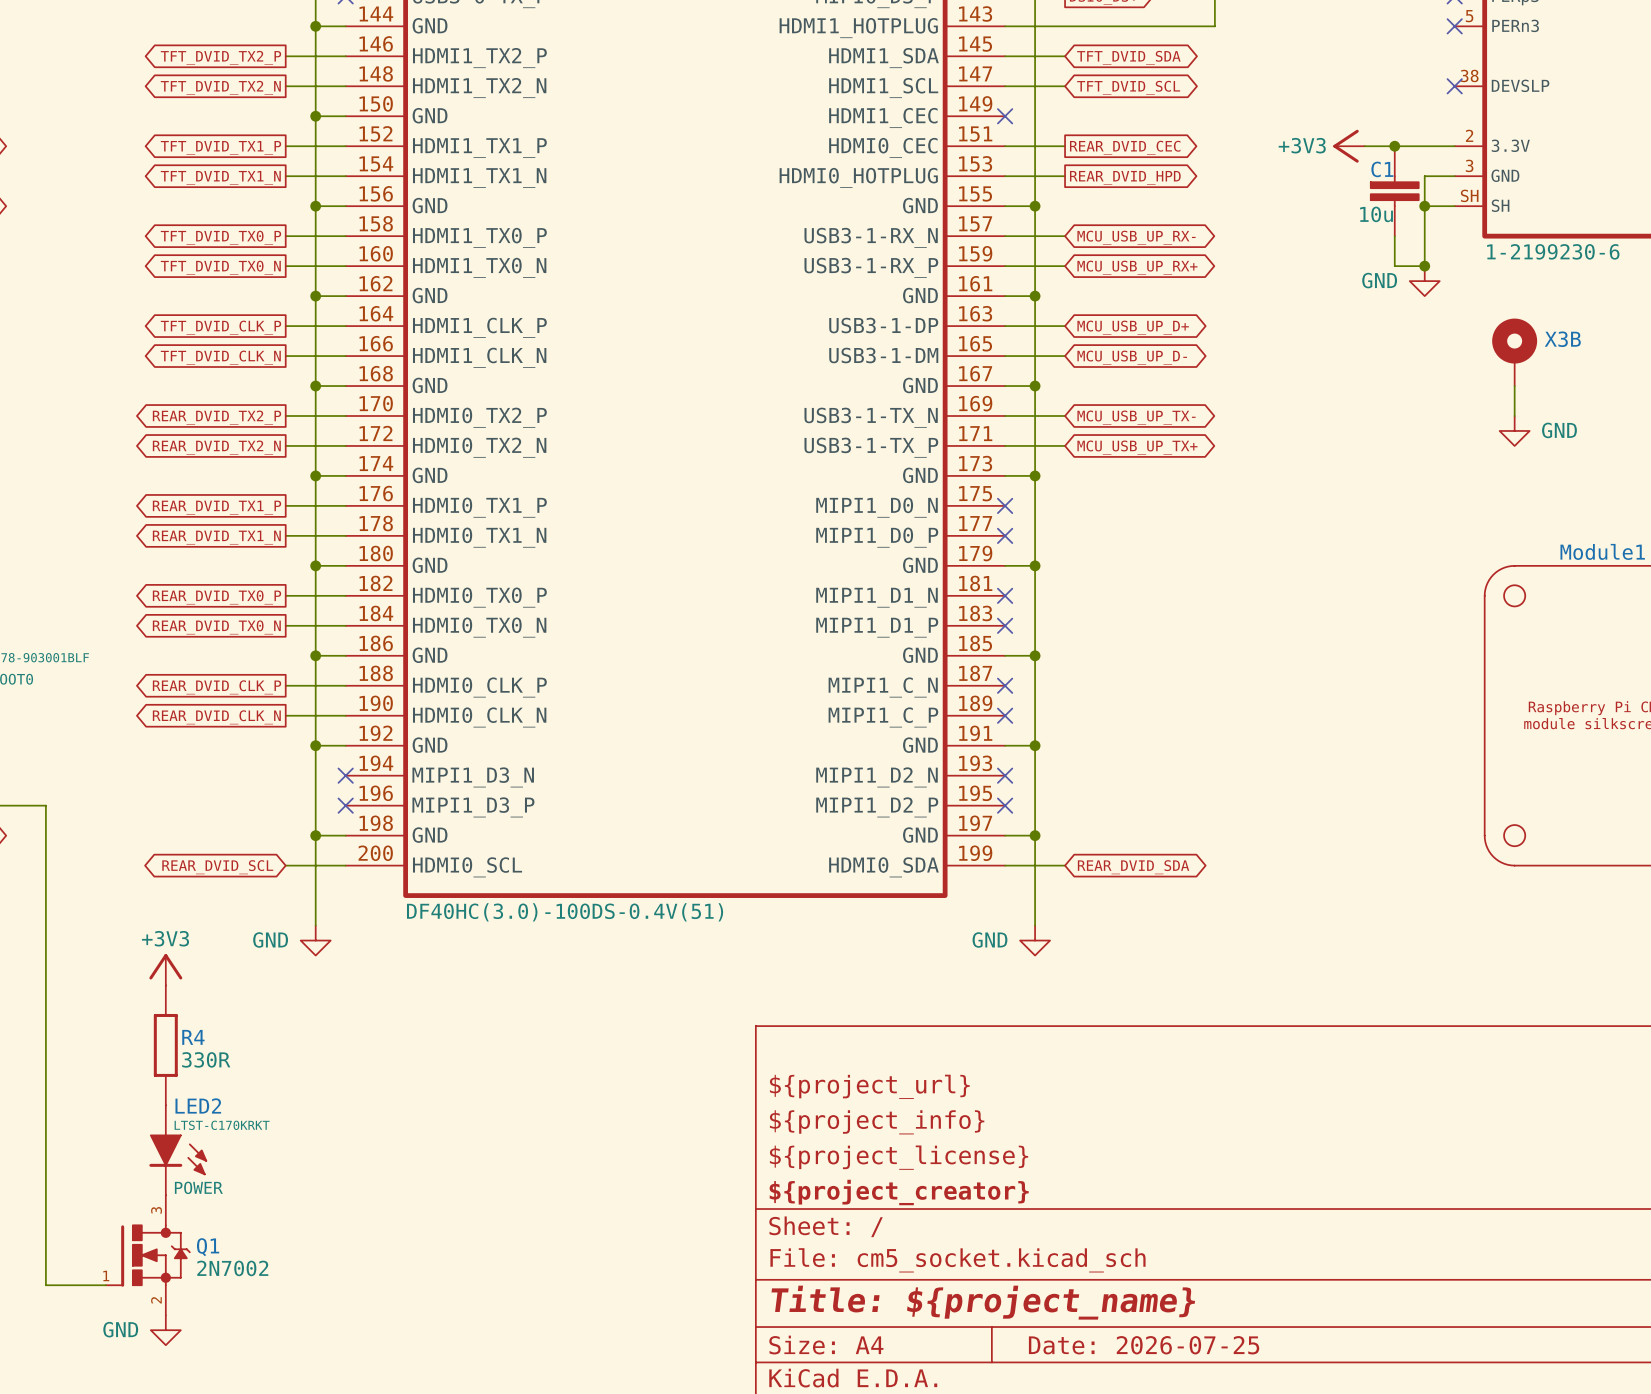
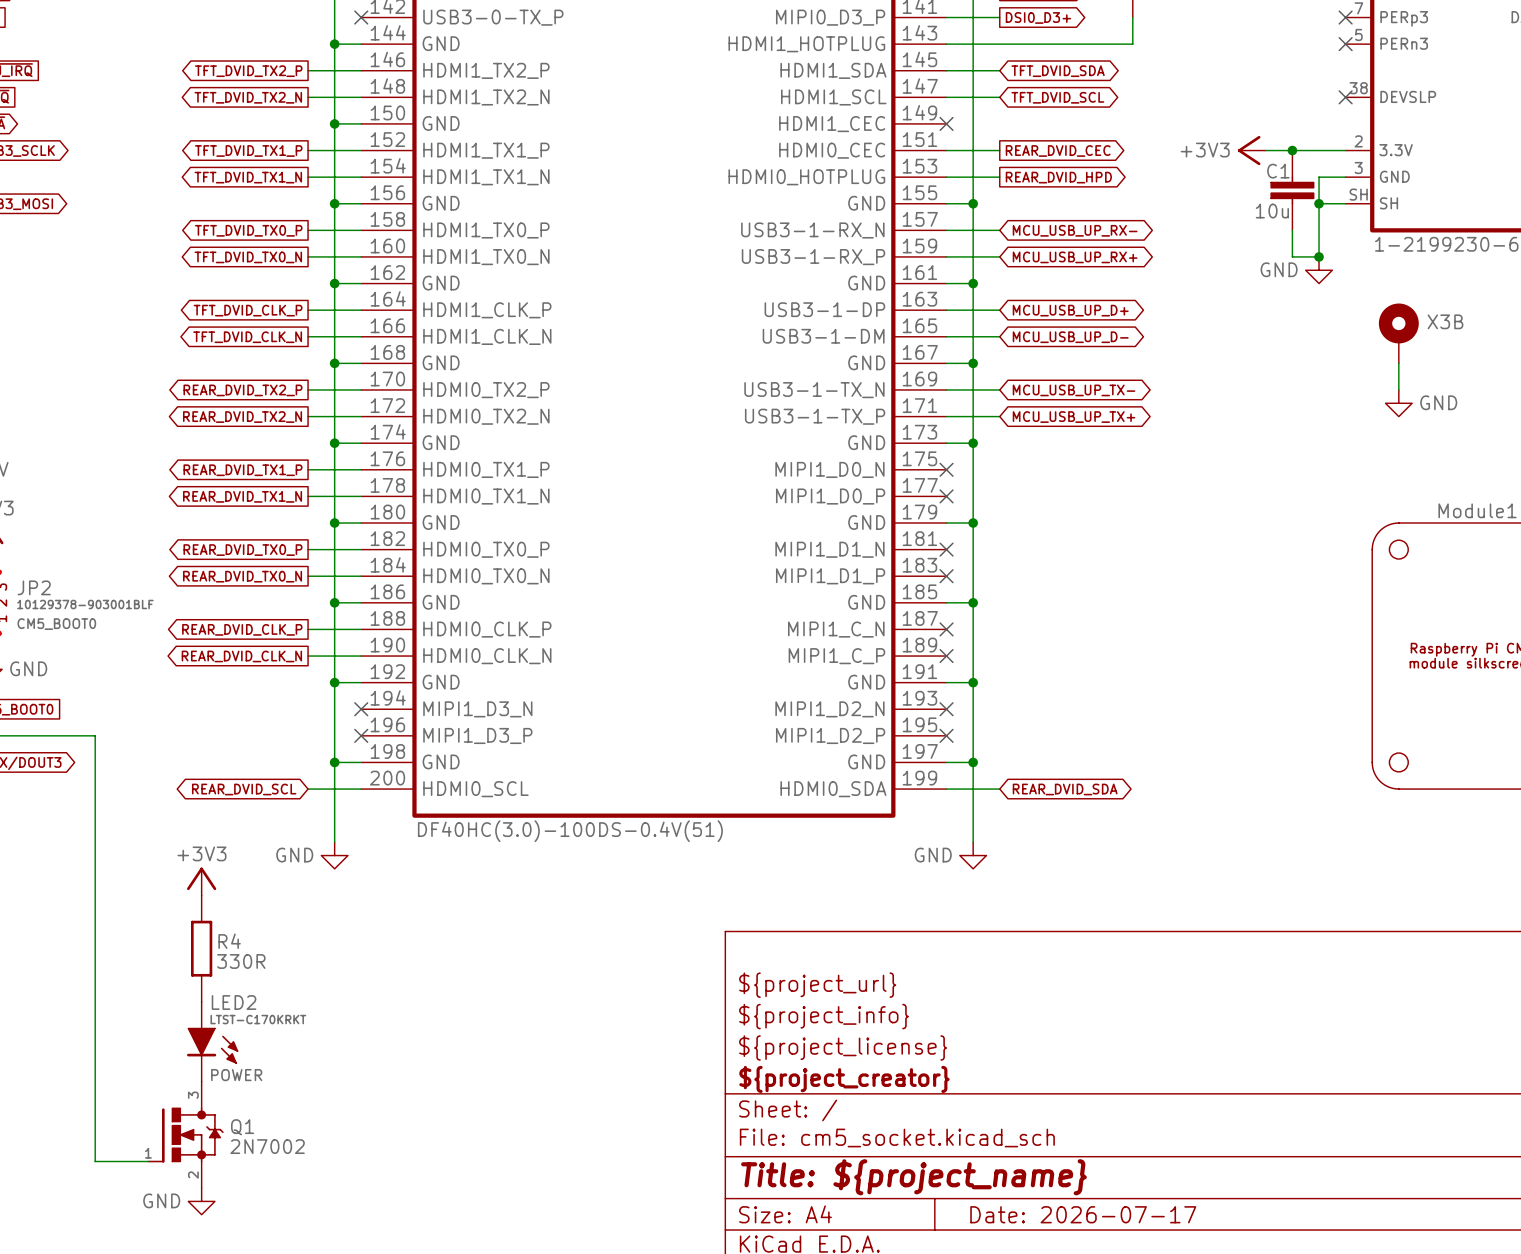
title block: Date: 2026-07-25 (1144, 1345) -> Date: 2026-07-17 (1083, 1214)

